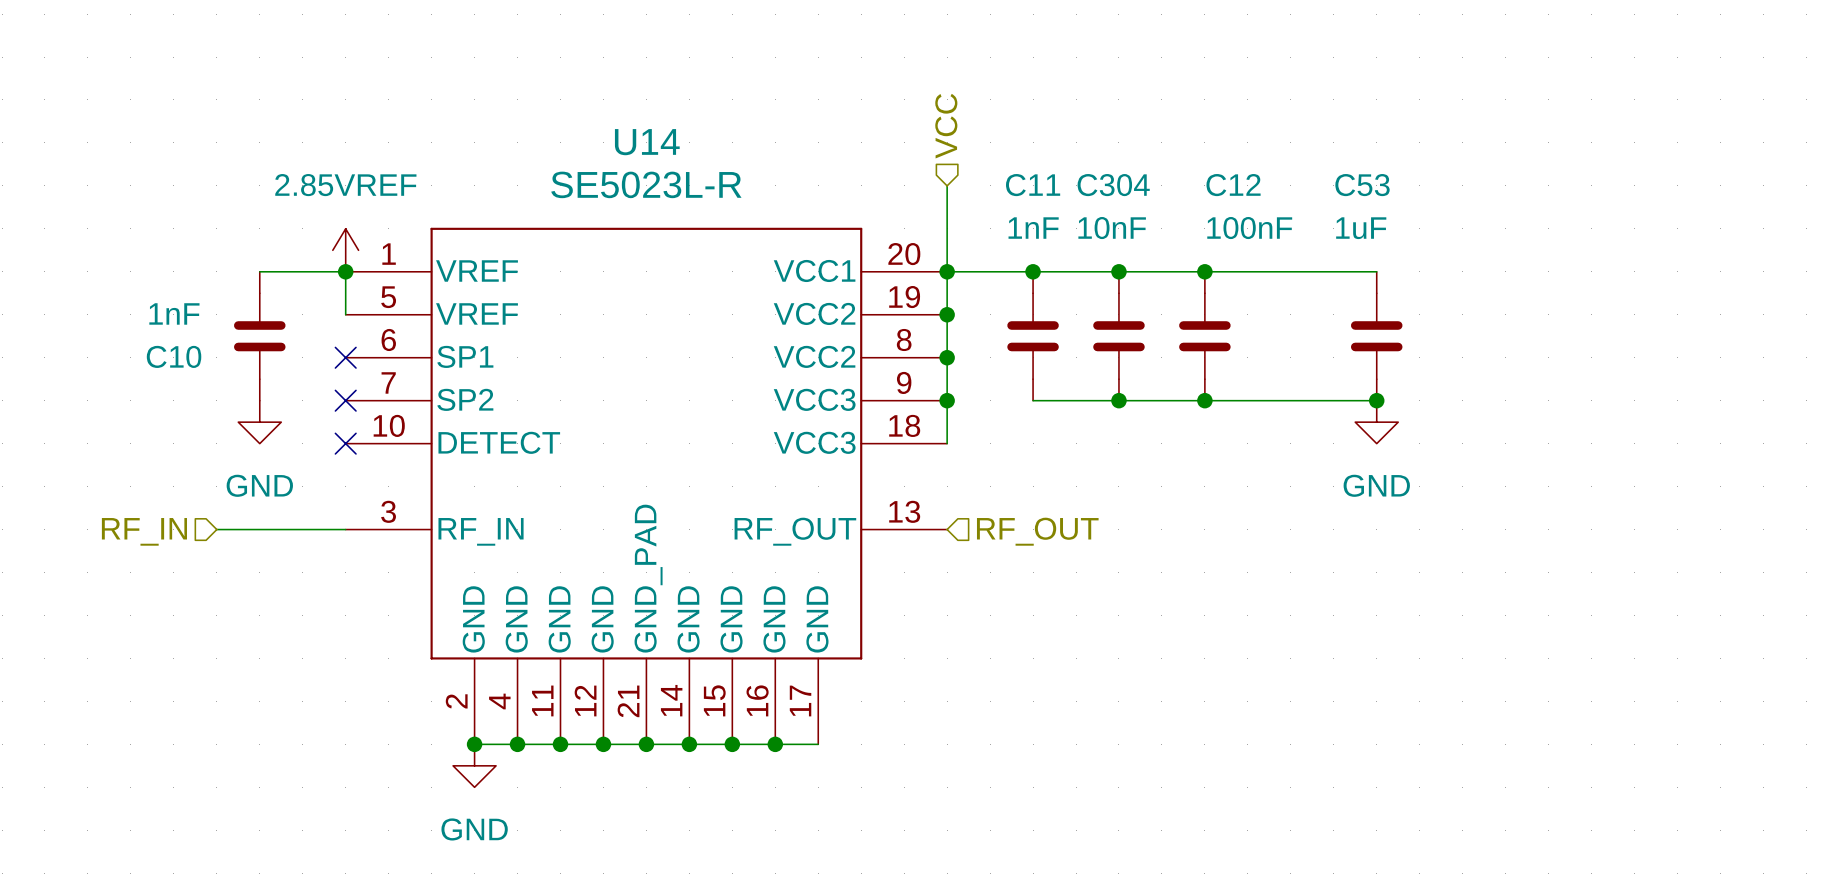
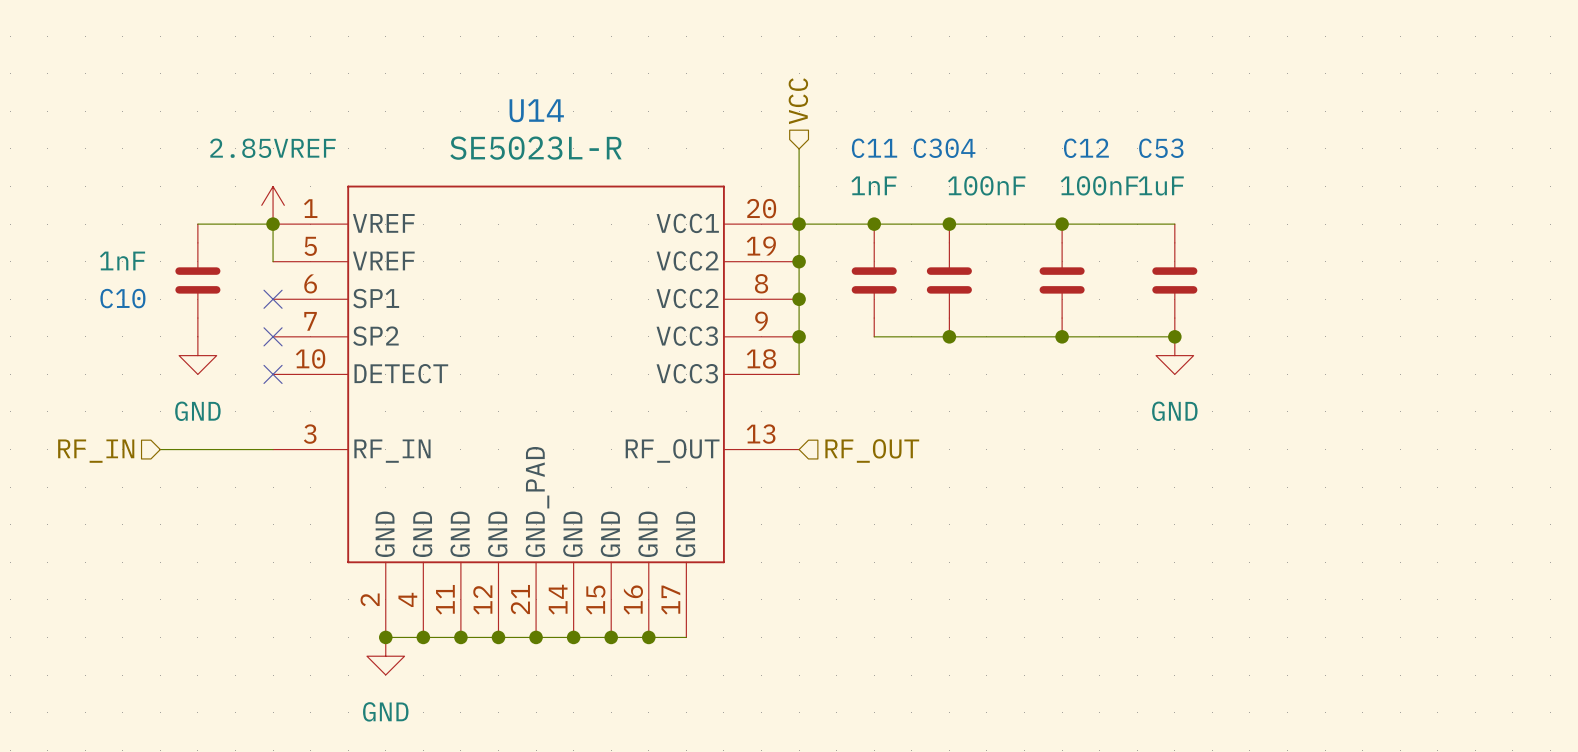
C304 value: 10nF (1112, 228) -> 100nF (986, 185)
C12 value position: 100nF (1249, 228) -> 100nF (1099, 185)
junction position: (1204, 271) -> (1062, 224)
C12 position: (1204, 336) -> (1062, 280)
junction position: (1204, 400) -> (1062, 336)

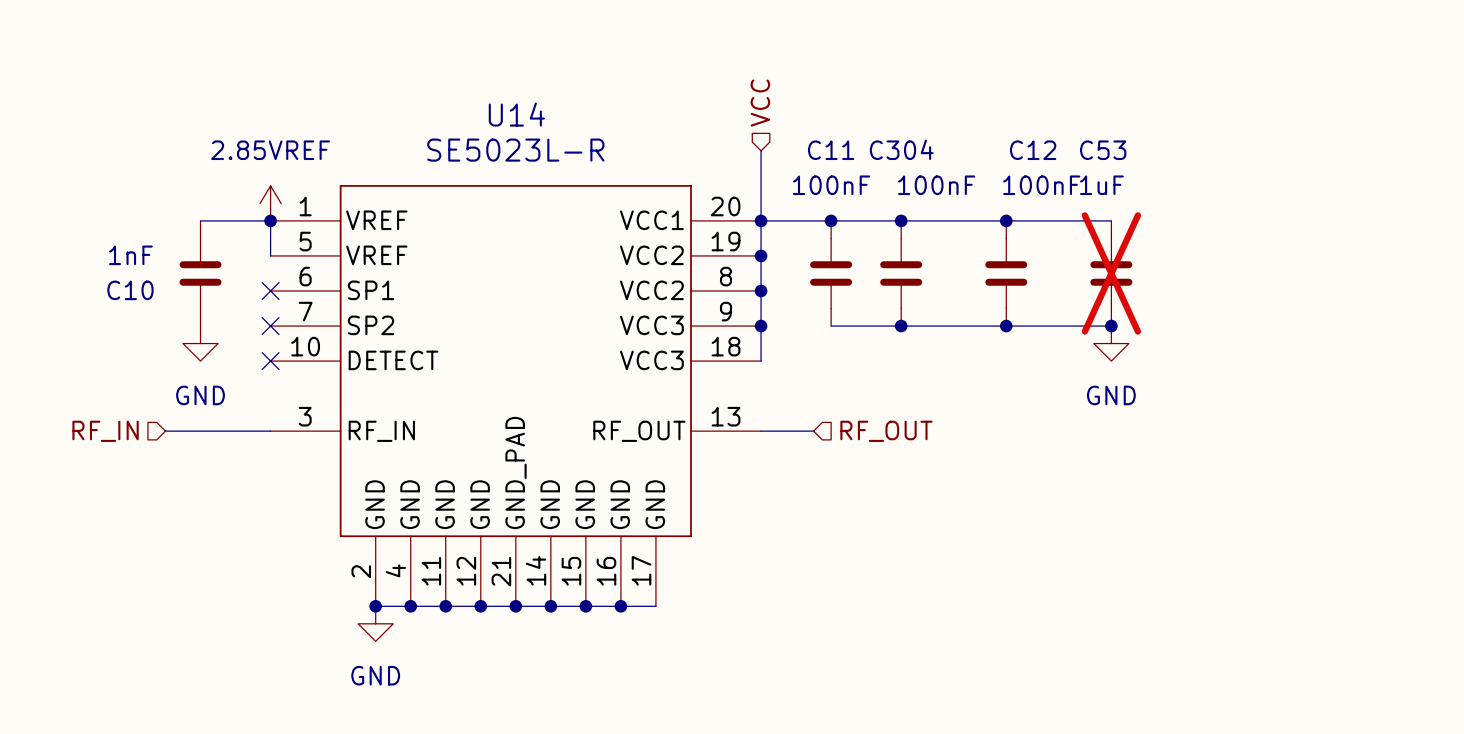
C11 value: 1nF (874, 185) -> 100nF (831, 185)
C53 do-not-place cross: none -> (1111, 273)
wire: none -> (761, 431) (813, 431)
hierarchical label position: RF_OUT (872, 450) -> RF_OUT (886, 431)

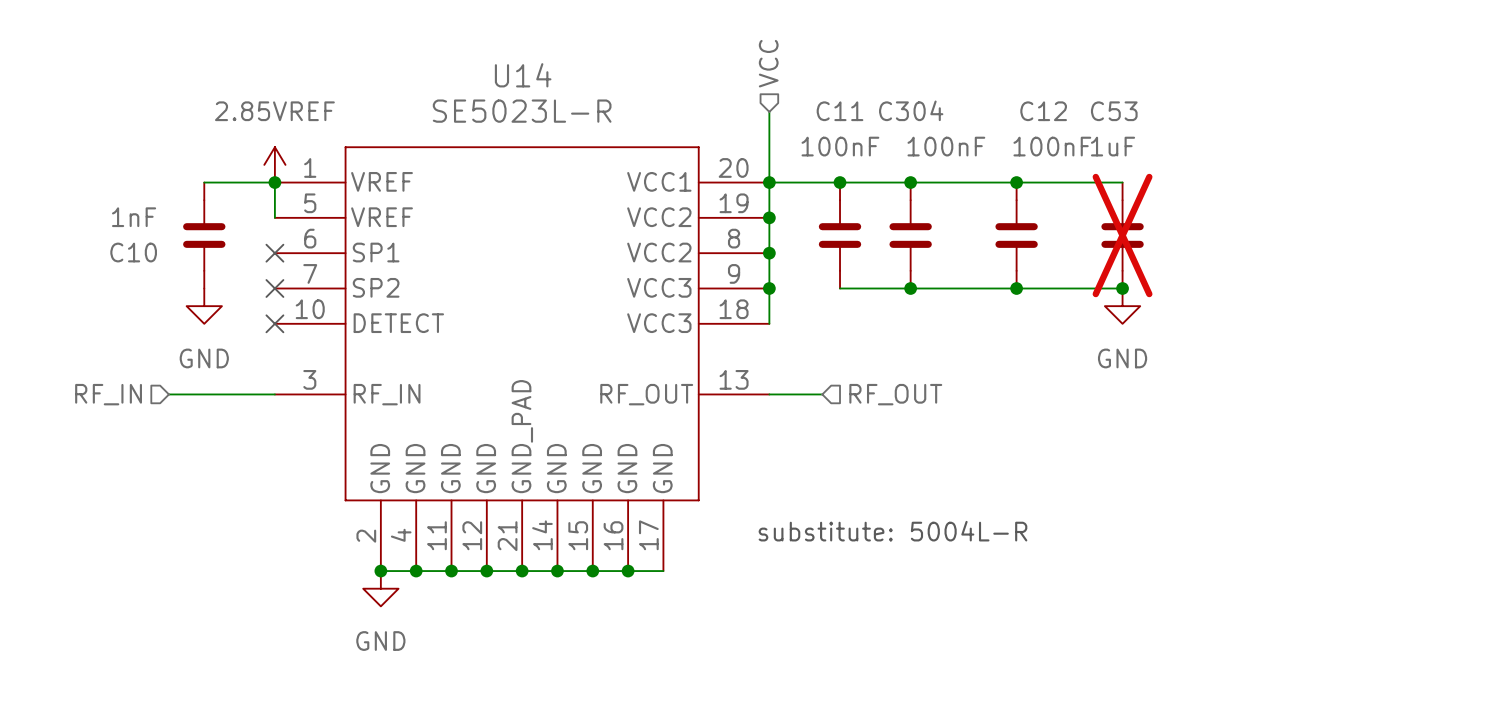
text: none -> substitute: 5004L-R (892, 531)

